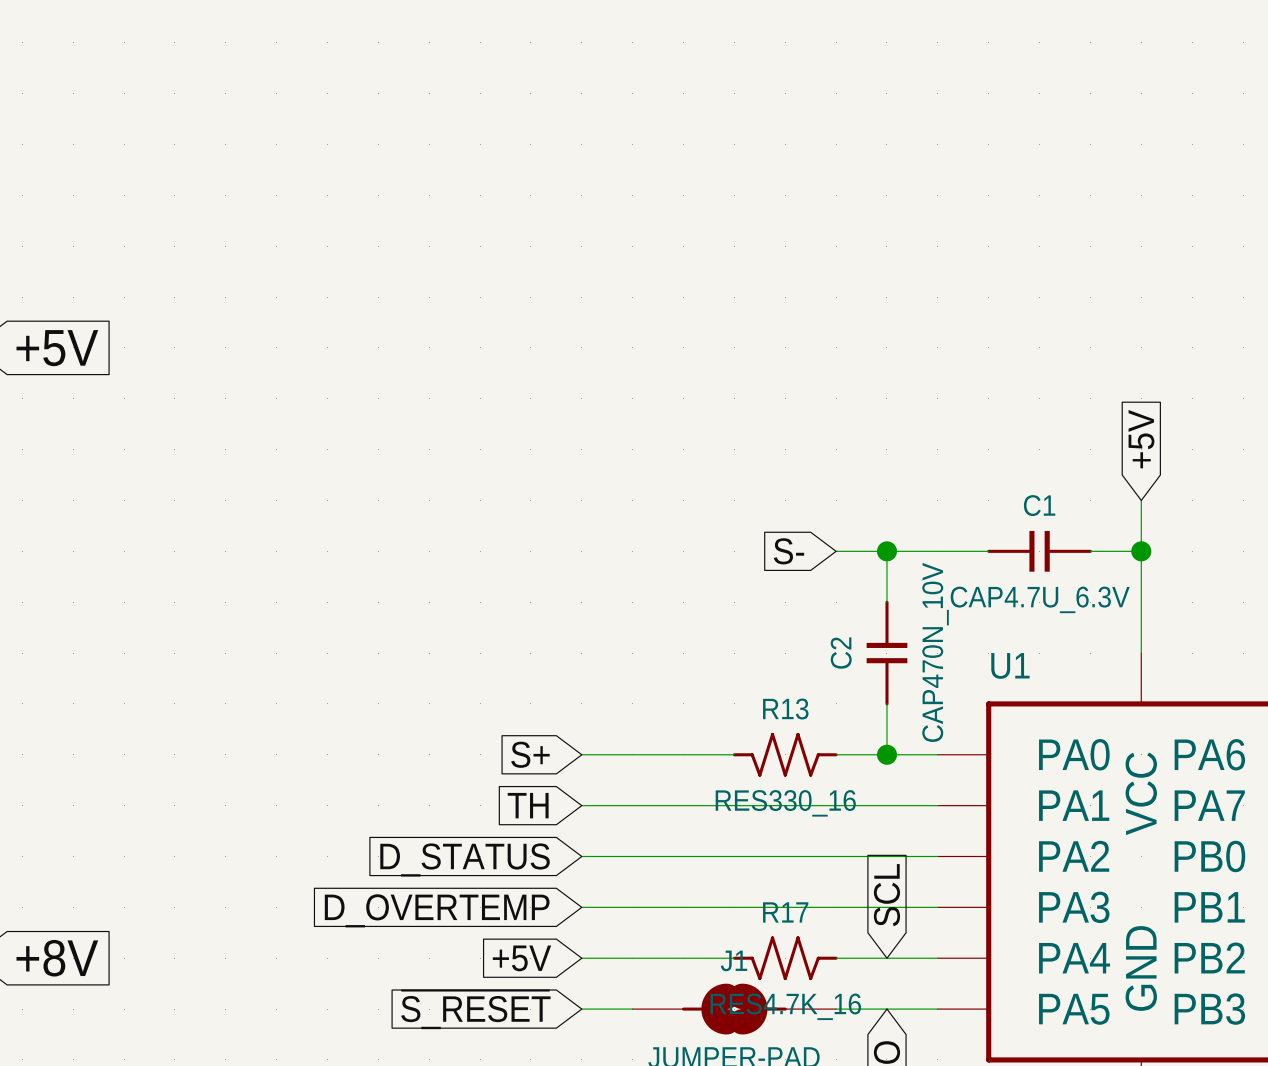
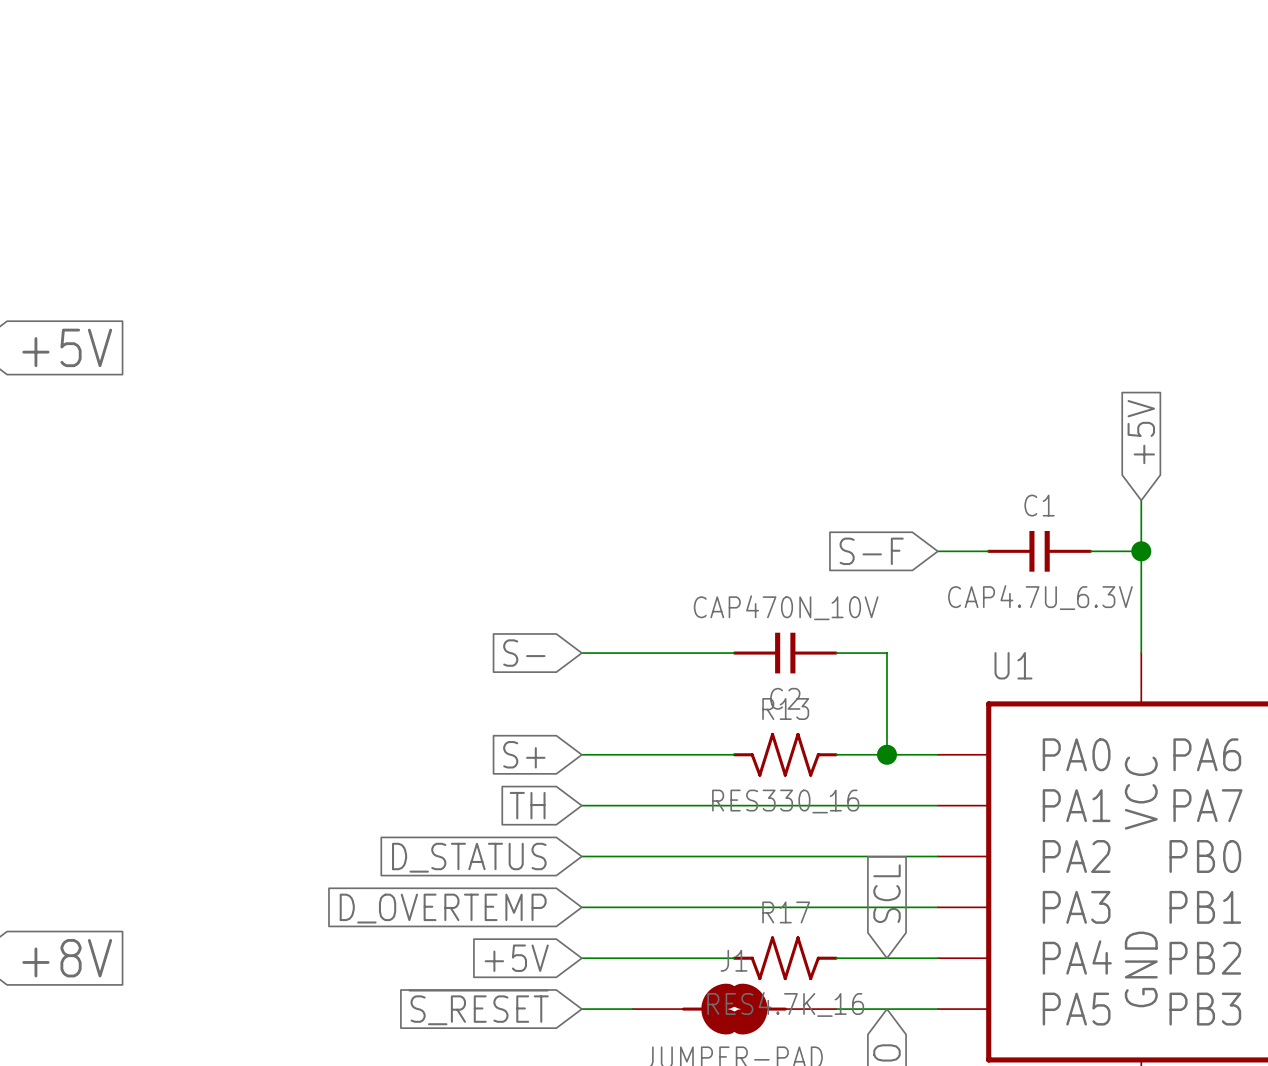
global label position: S- (788, 551) -> S- (524, 653)
wire: (836, 551) (937, 551) -> none
global label: none -> S-F (871, 551)
wire: (886, 551) (886, 602) -> none
junction: (886, 551) -> none
C2 value position: CAP470N_10V (935, 652) -> CAP470N_10V (786, 607)
wire: none -> (581, 653) (734, 653)
wire: none -> (836, 653) (886, 653) (886, 703)
C2 name position: C2 (841, 653) -> C2 (785, 698)
C2 rotation: 0° (886, 653) -> 90° clockwise (785, 653)
C2 position: (886, 653) -> (785, 653)

